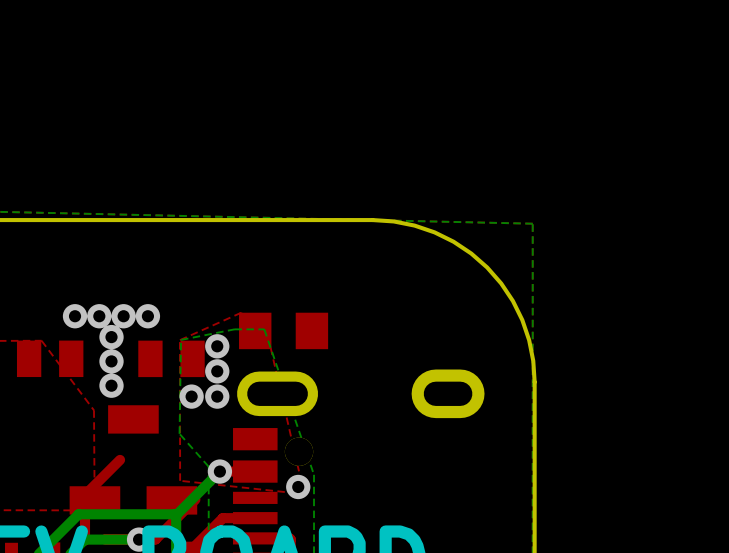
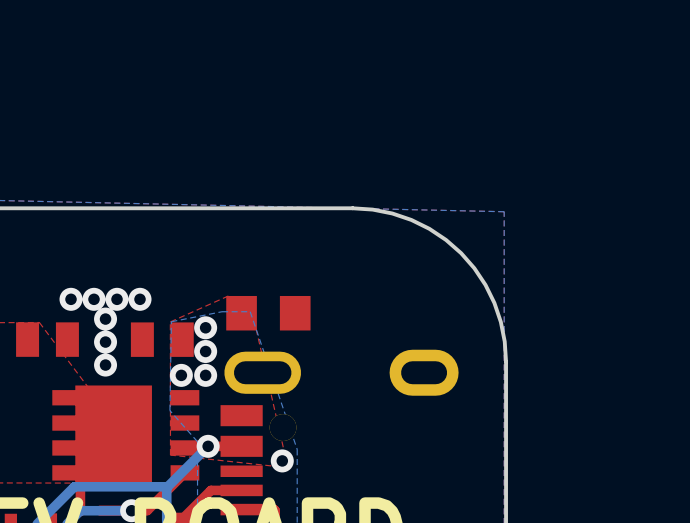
part footprint: [69, 405, 198, 515] -> [52, 385, 200, 486]

